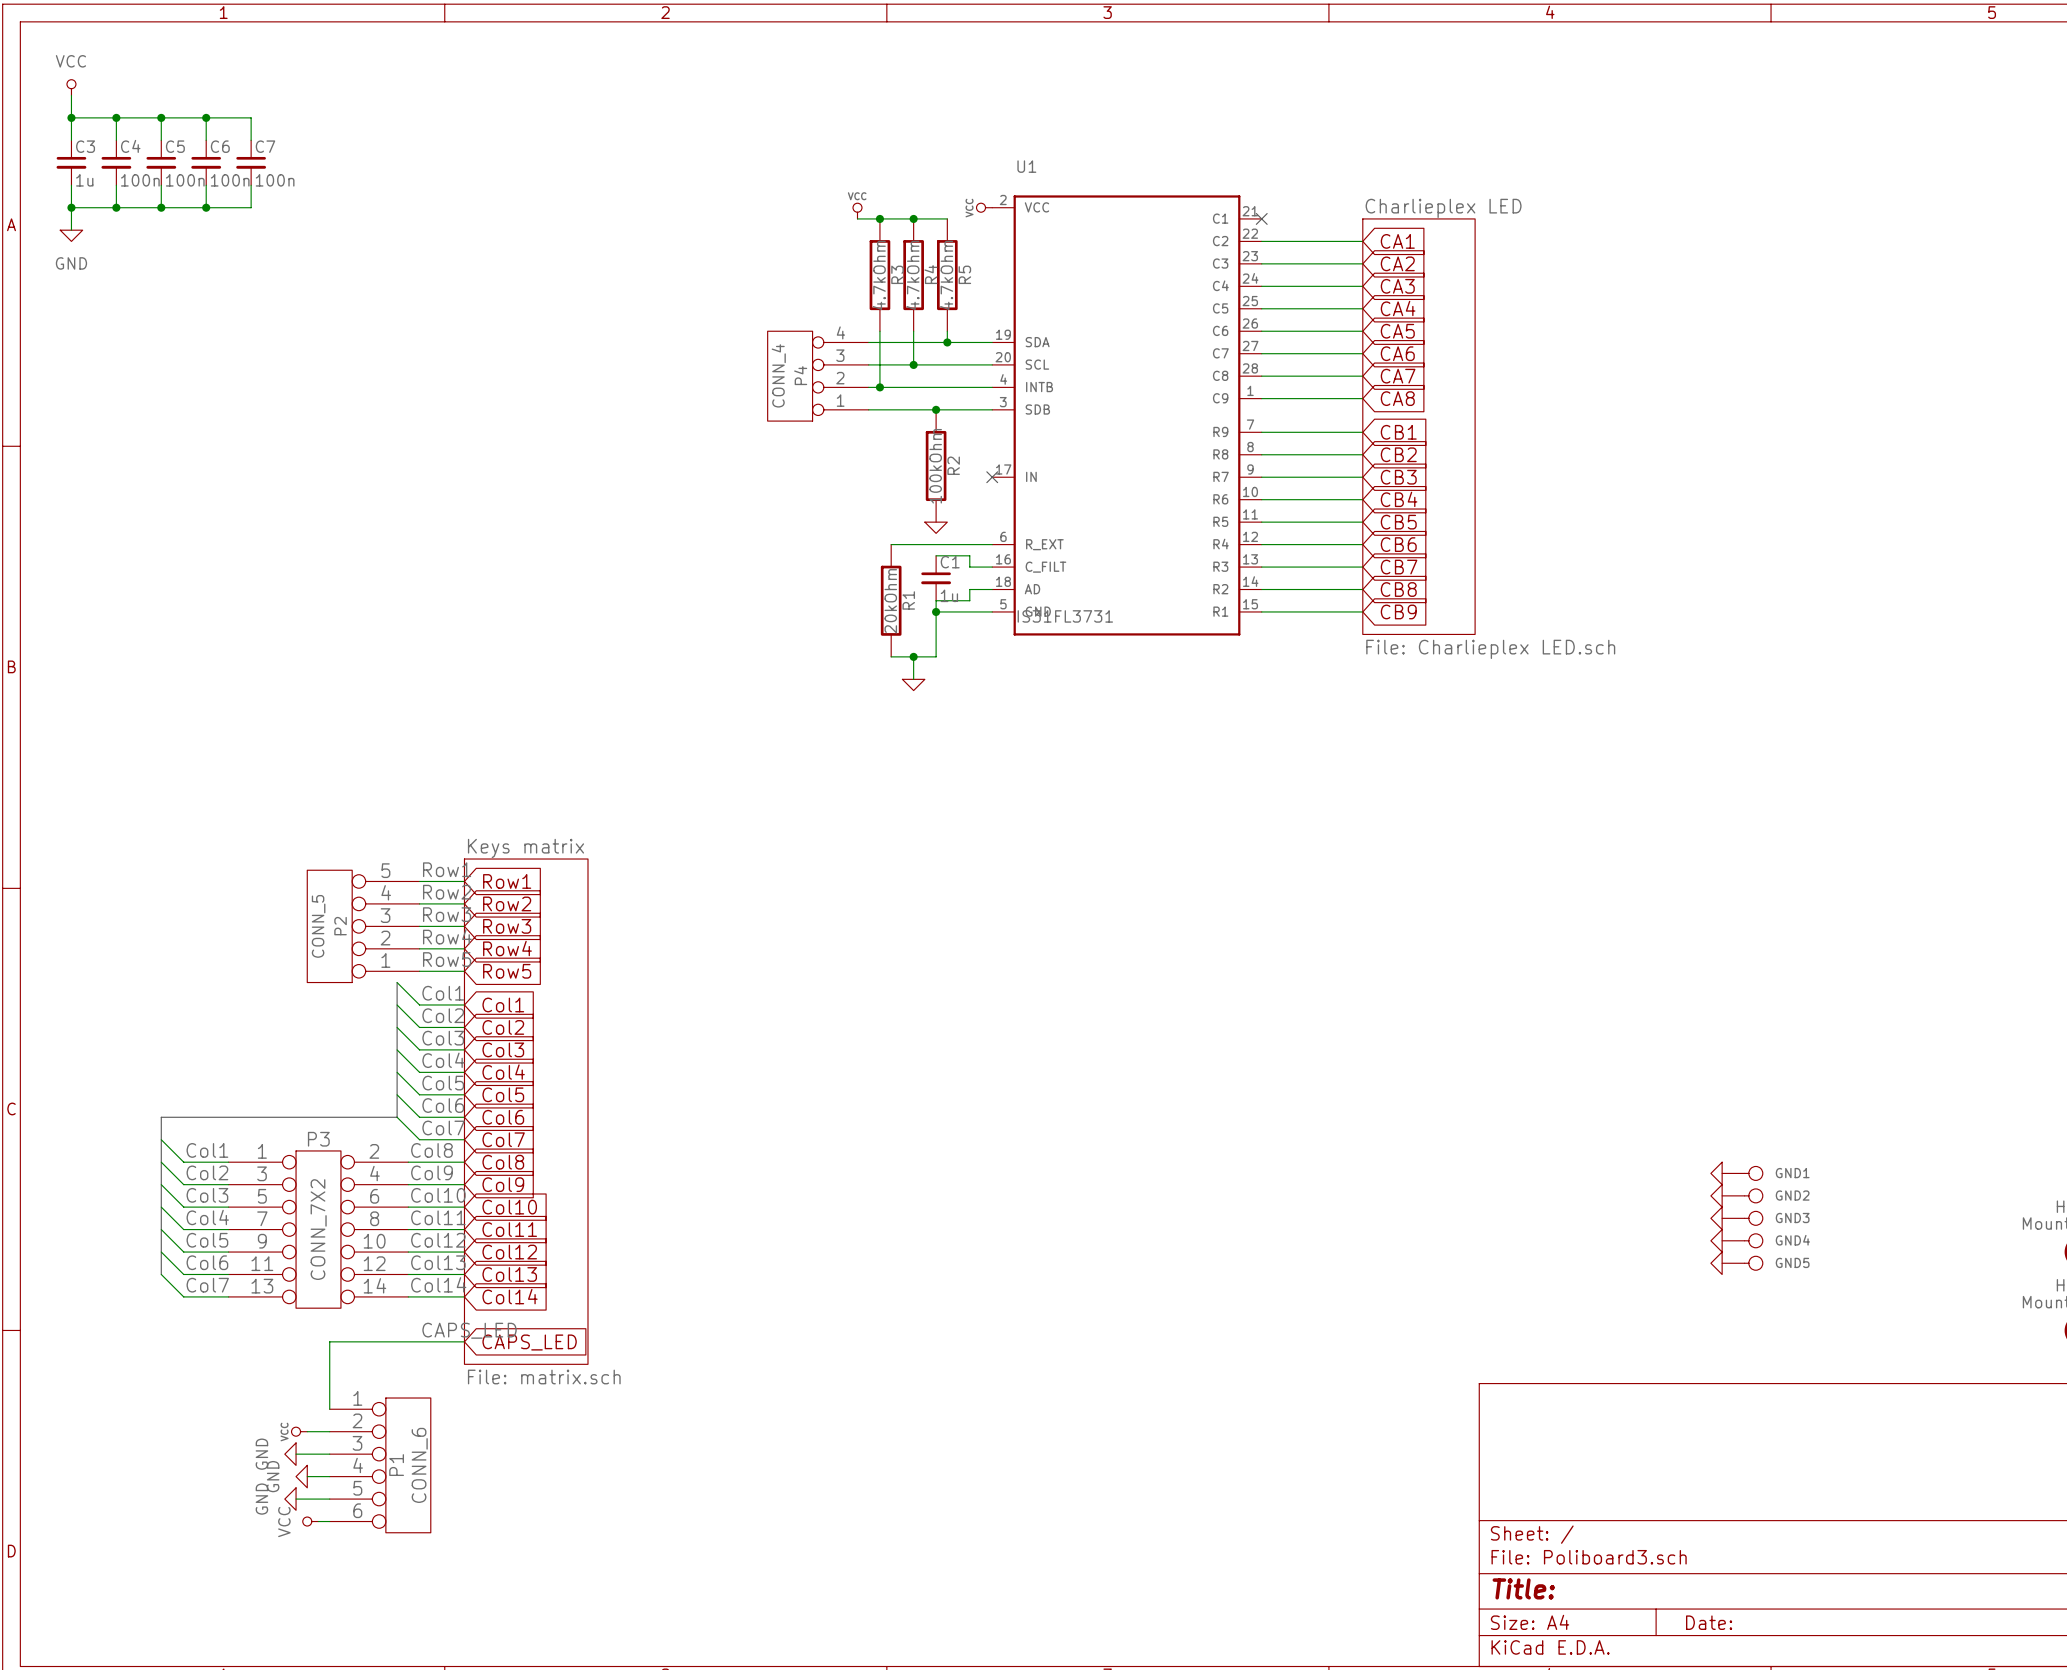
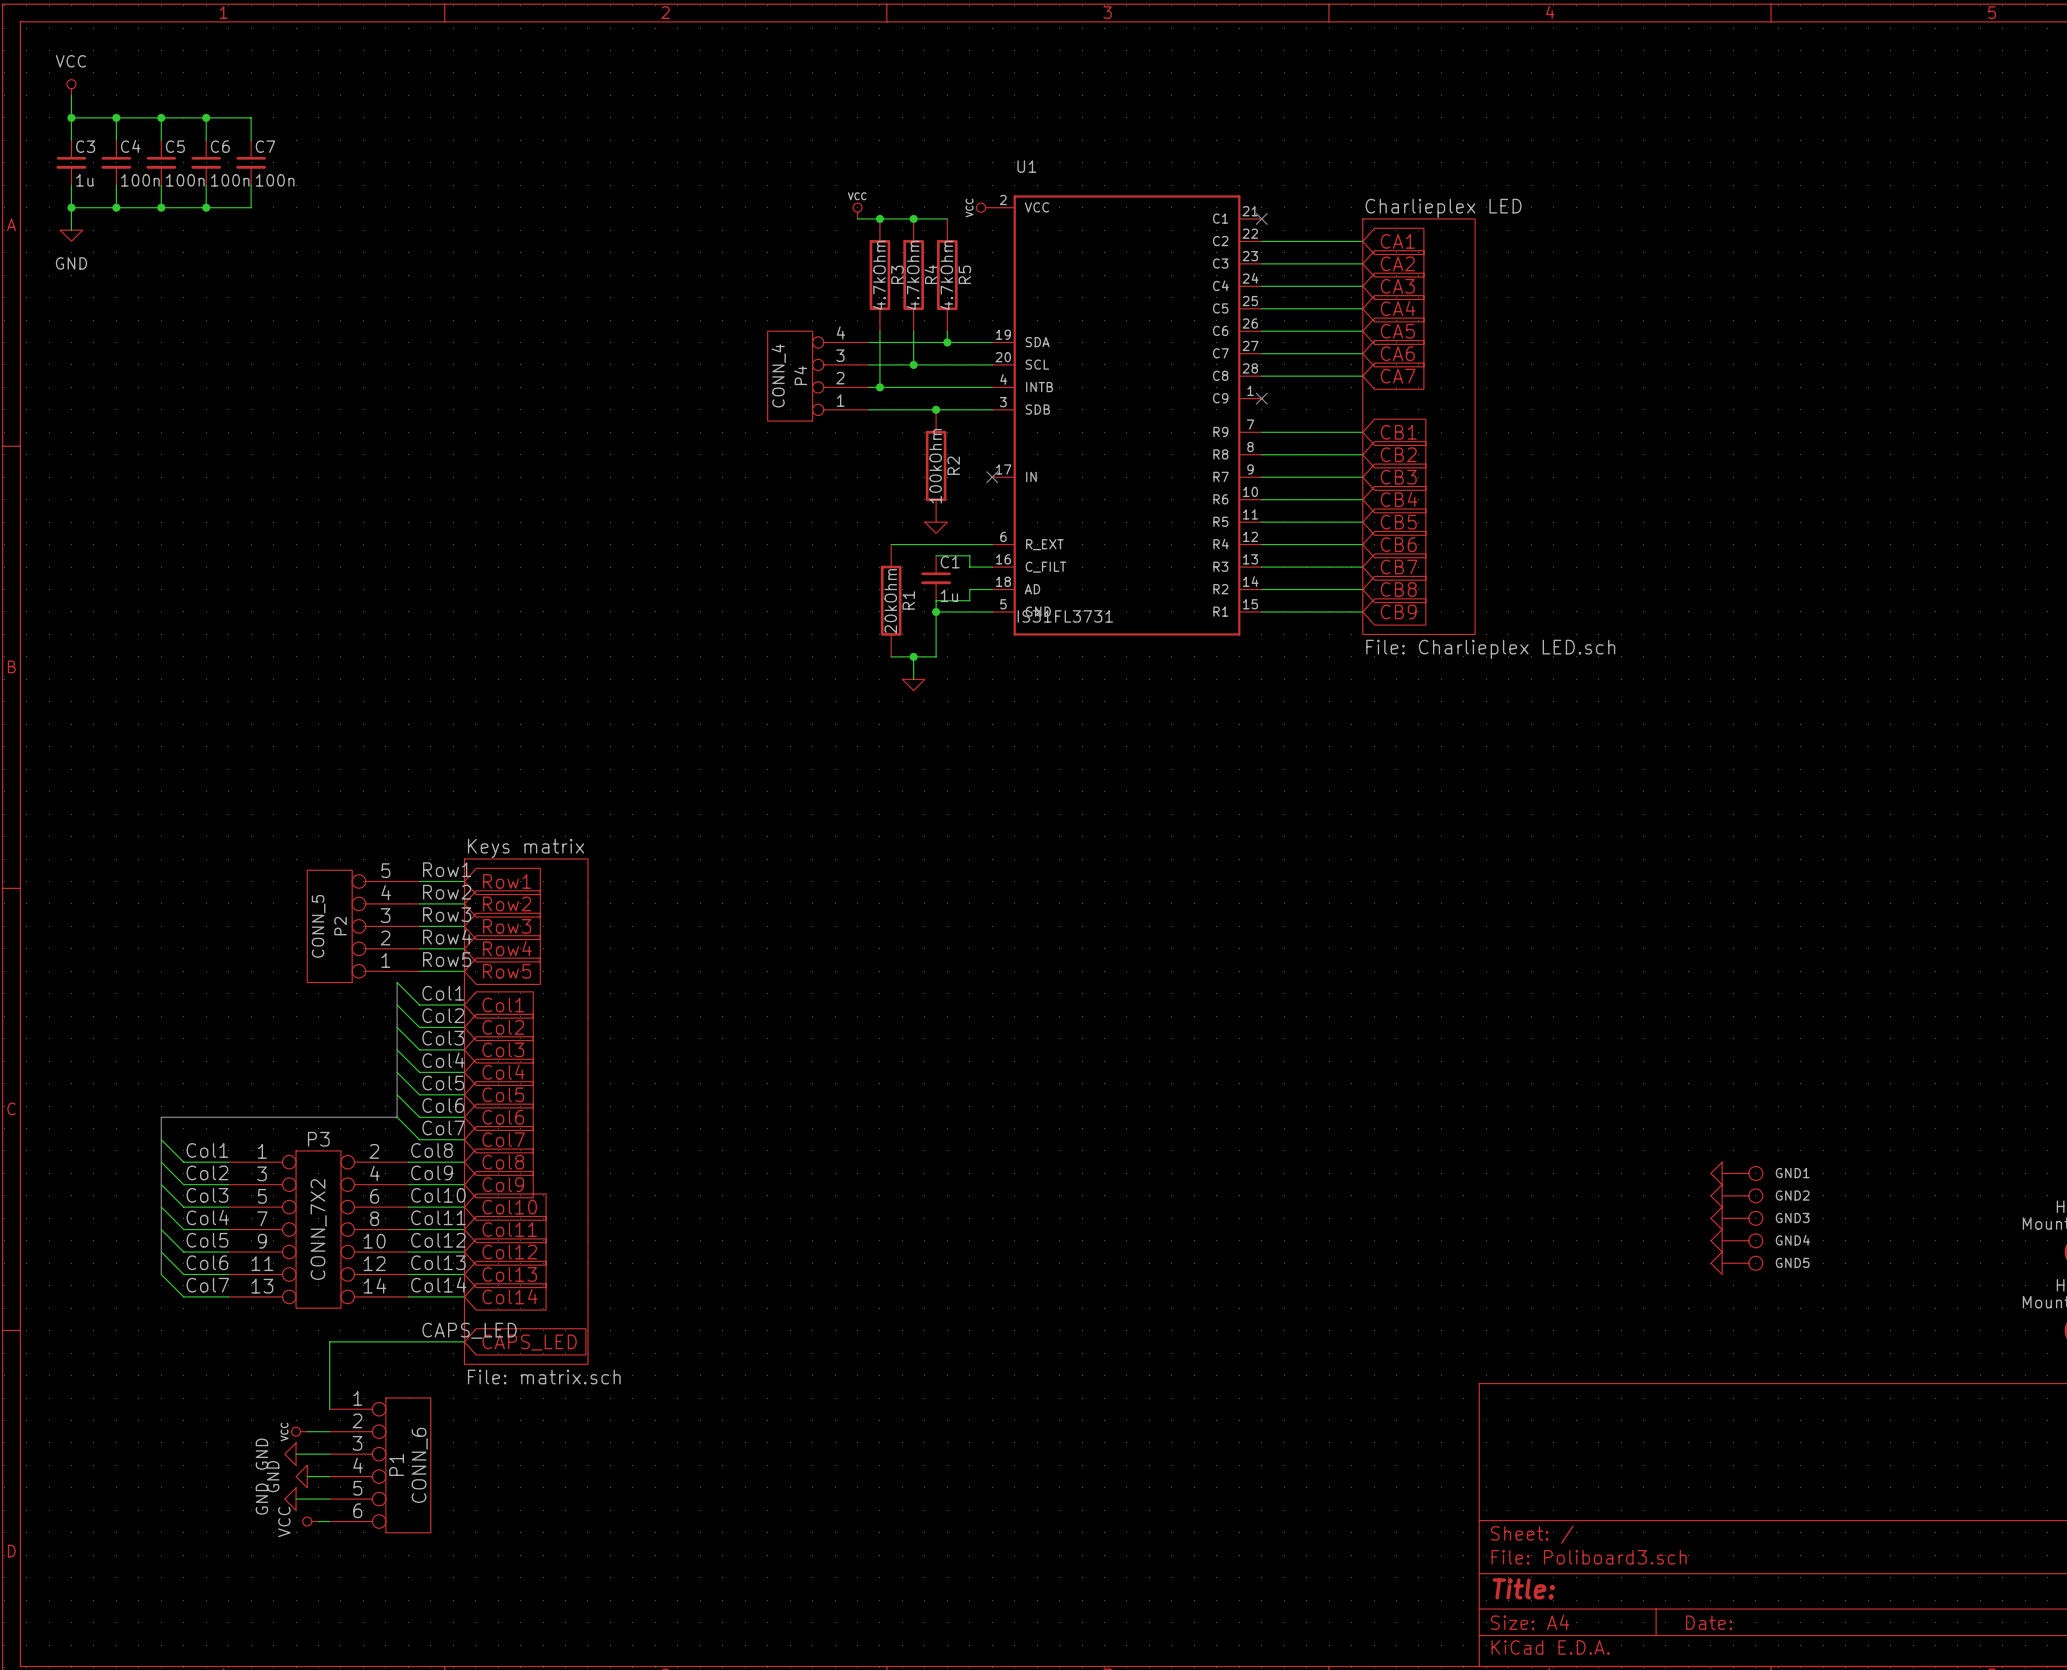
wire: (1261, 398) (1362, 398) -> none
no-connect mark: none -> (1261, 398)
global label: CA8 (1397, 398) -> none

